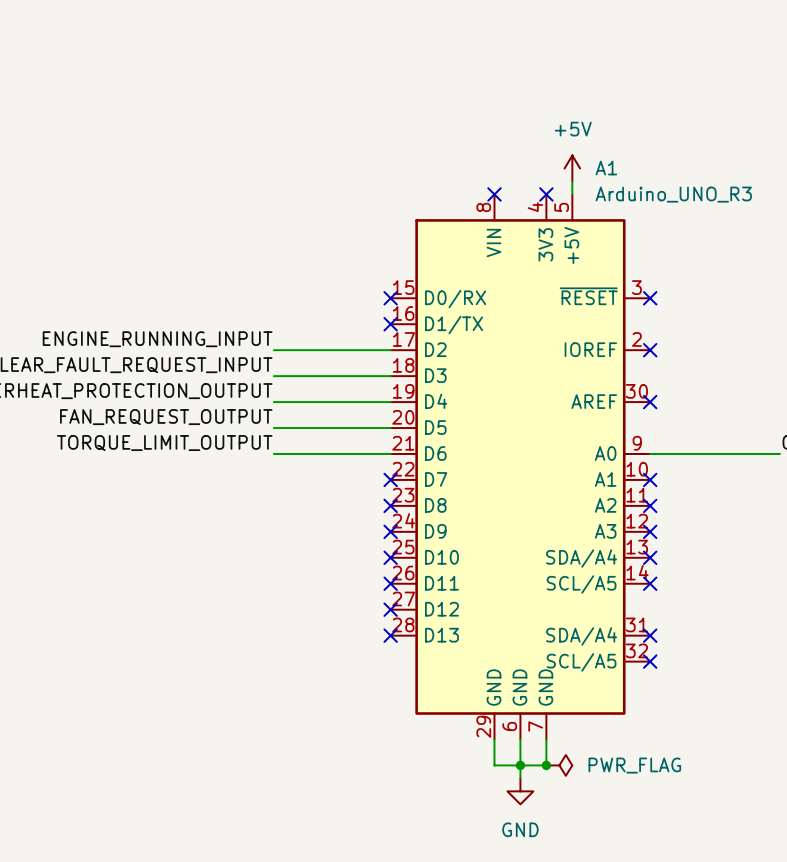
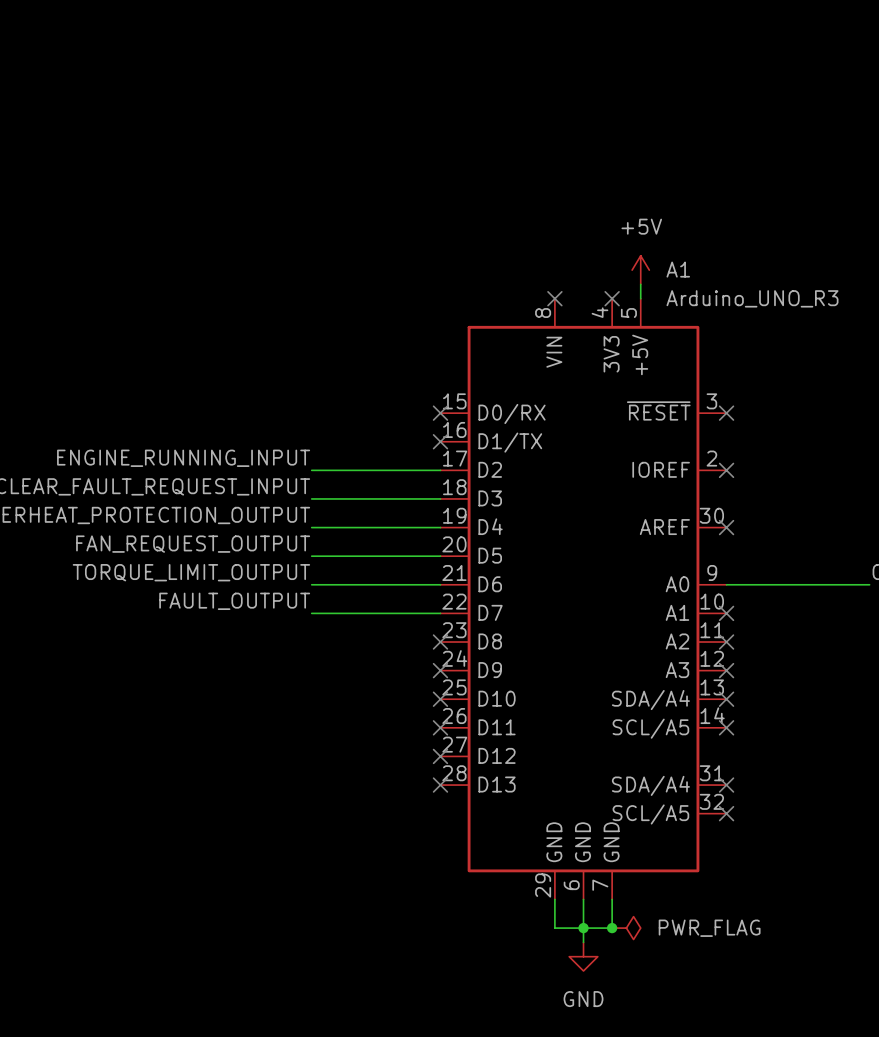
label: none -> FAULT_OUTPUT (234, 601)
wire: none -> (311, 613) (440, 613)
no-connect mark: (390, 479) -> none

